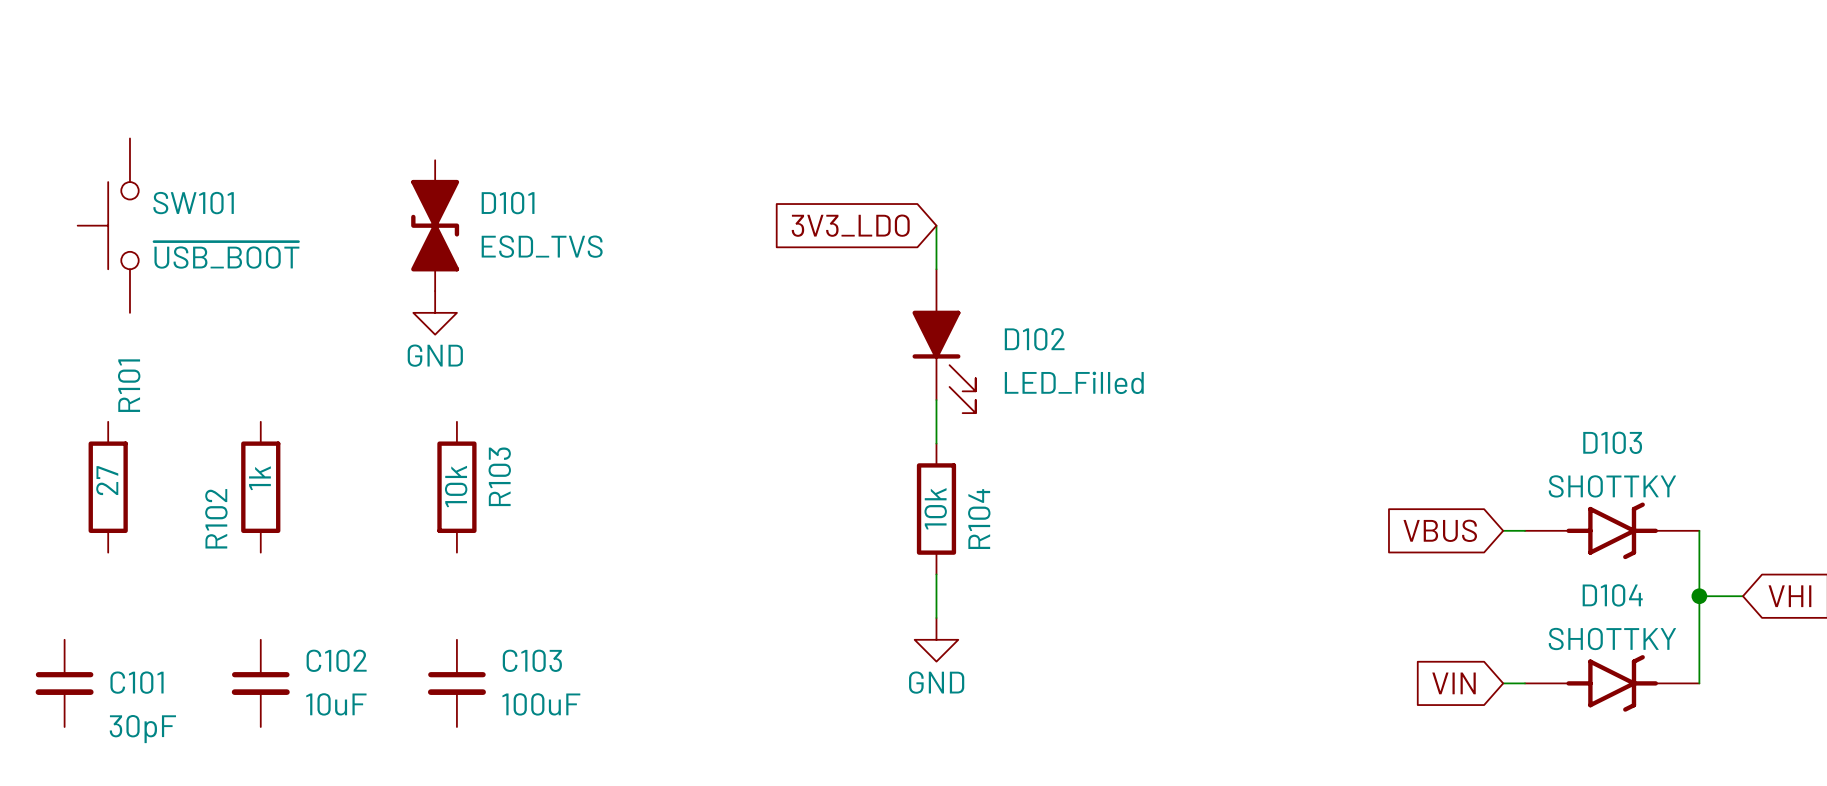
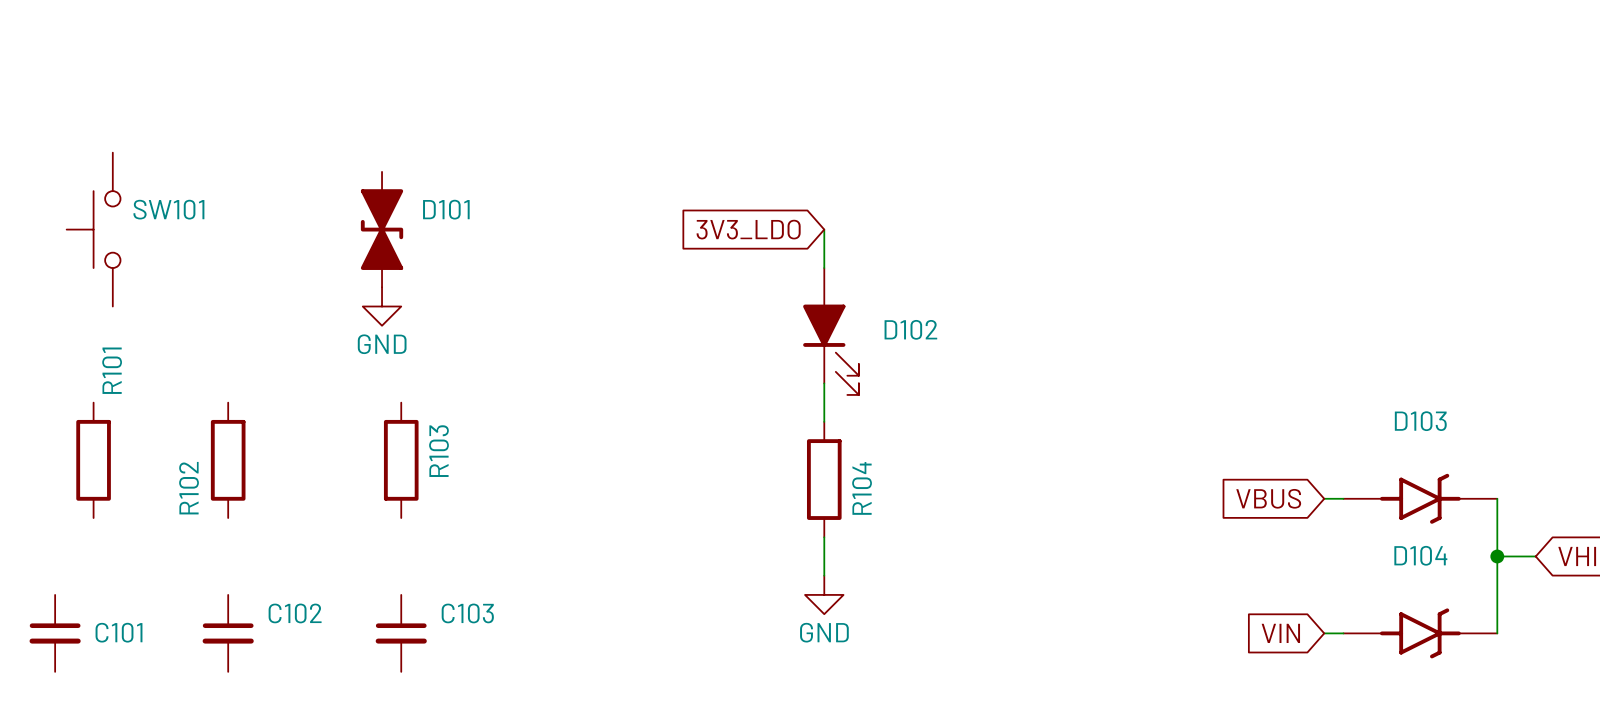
D101 value: ESD_TVS (542, 246) -> none
SW101 value: ~{USB_BOOT} (226, 255) -> none
D102 value: LED_Filled (1074, 382) -> none
R102 value: 1k (259, 478) -> none
R101 value: 27 (107, 480) -> none
R103 value: 10k (456, 486) -> none
D103 value: SHOTTKY (1612, 486) -> none
R104 value: 10k (935, 508) -> none
D104 value: SHOTTKY (1612, 638) -> none
C102 value: 10uF (336, 704) -> none
C103 value: 100uF (541, 704) -> none
C101 value: 30pF (142, 729) -> none

